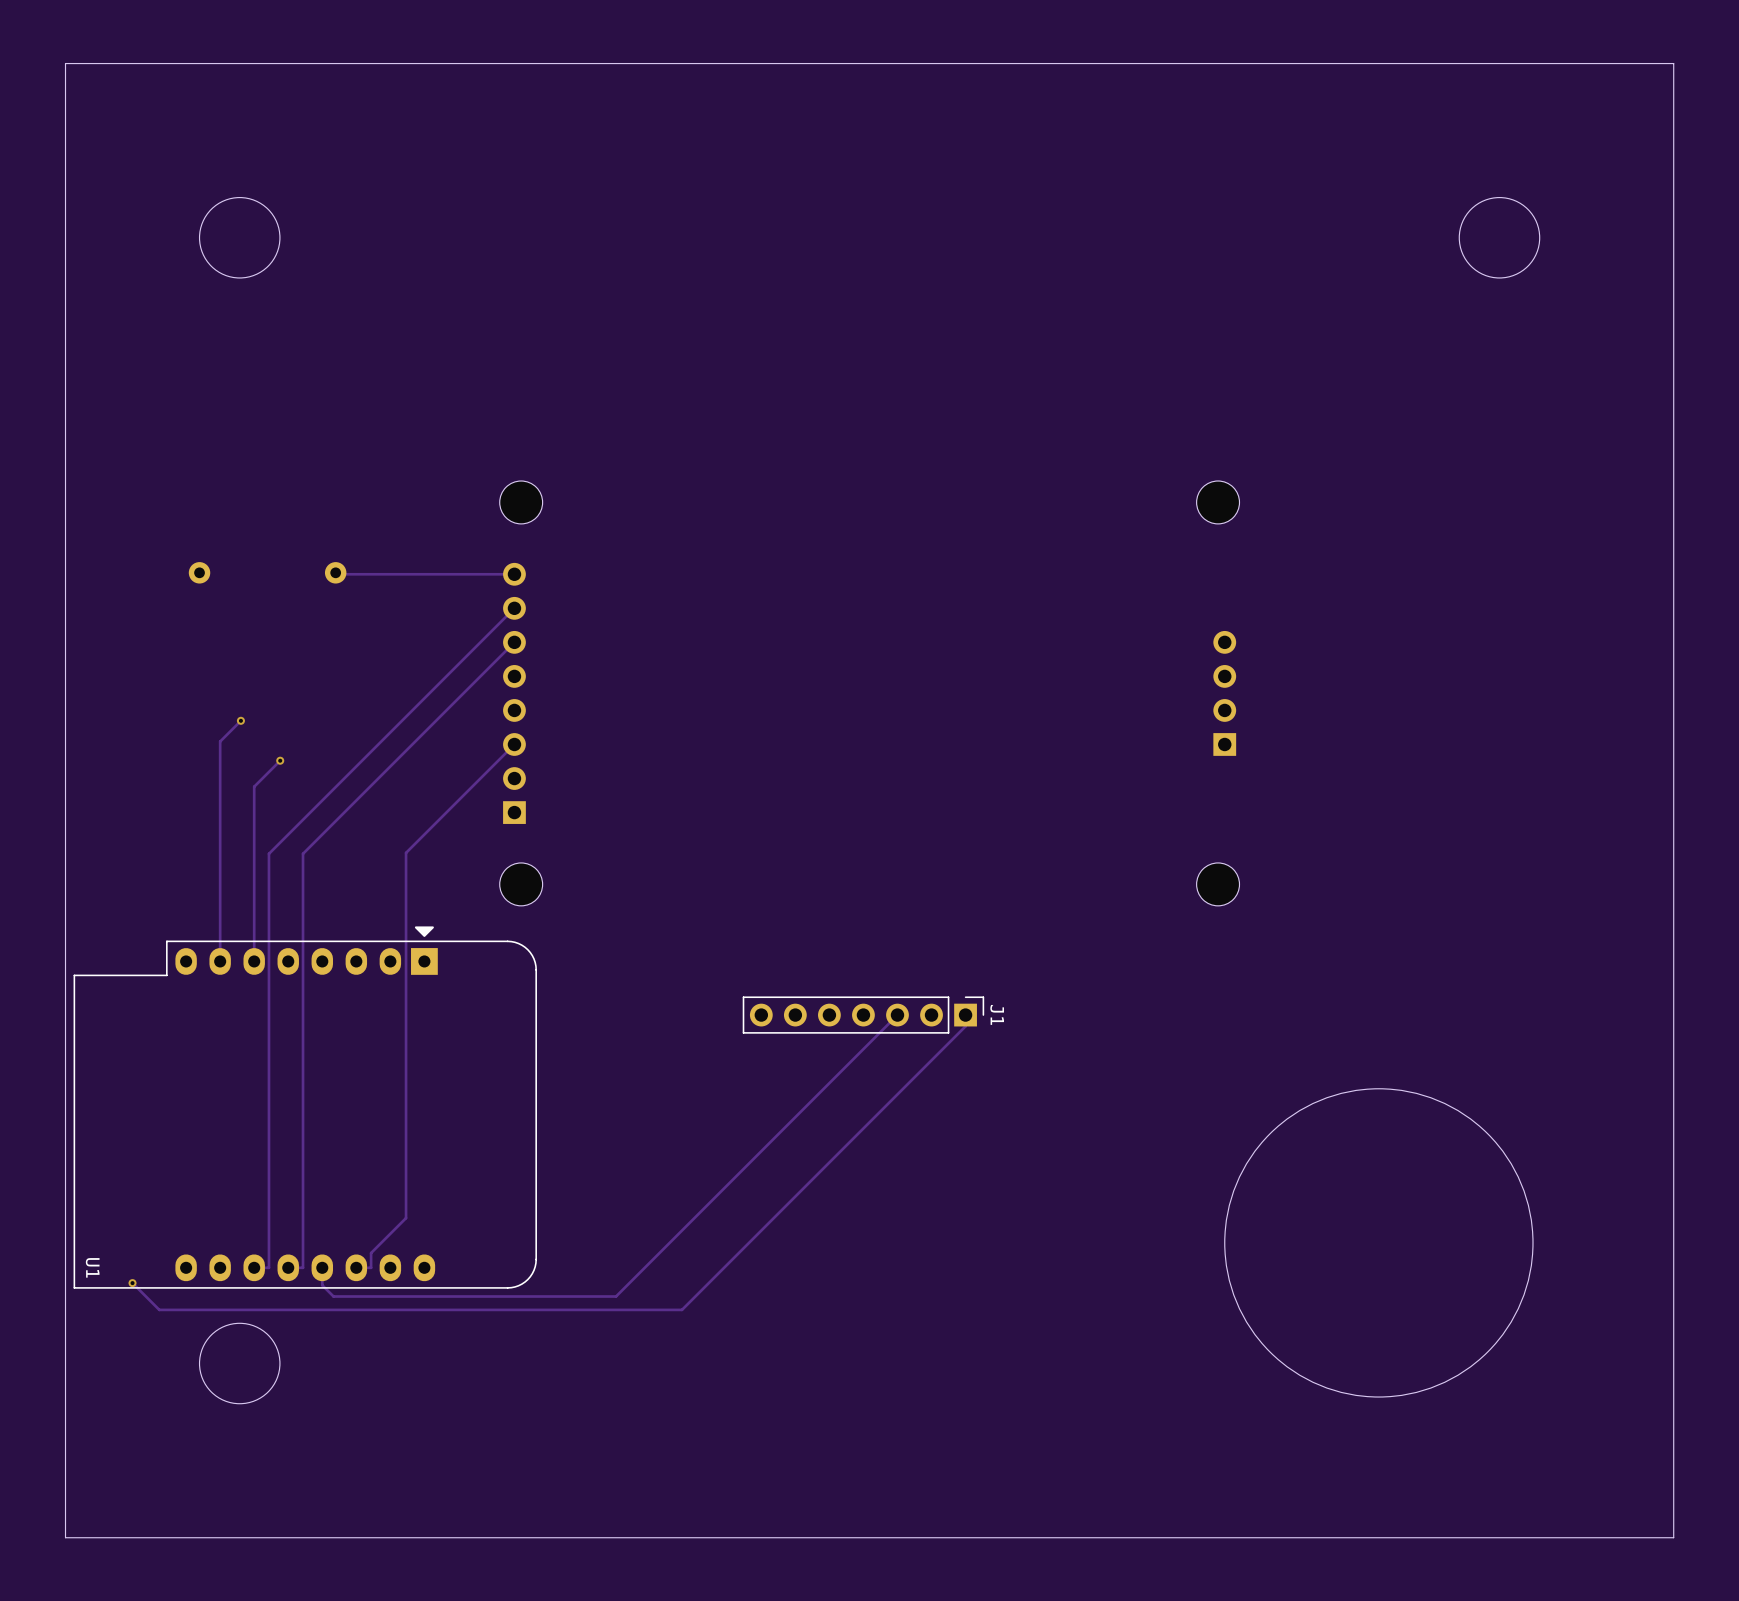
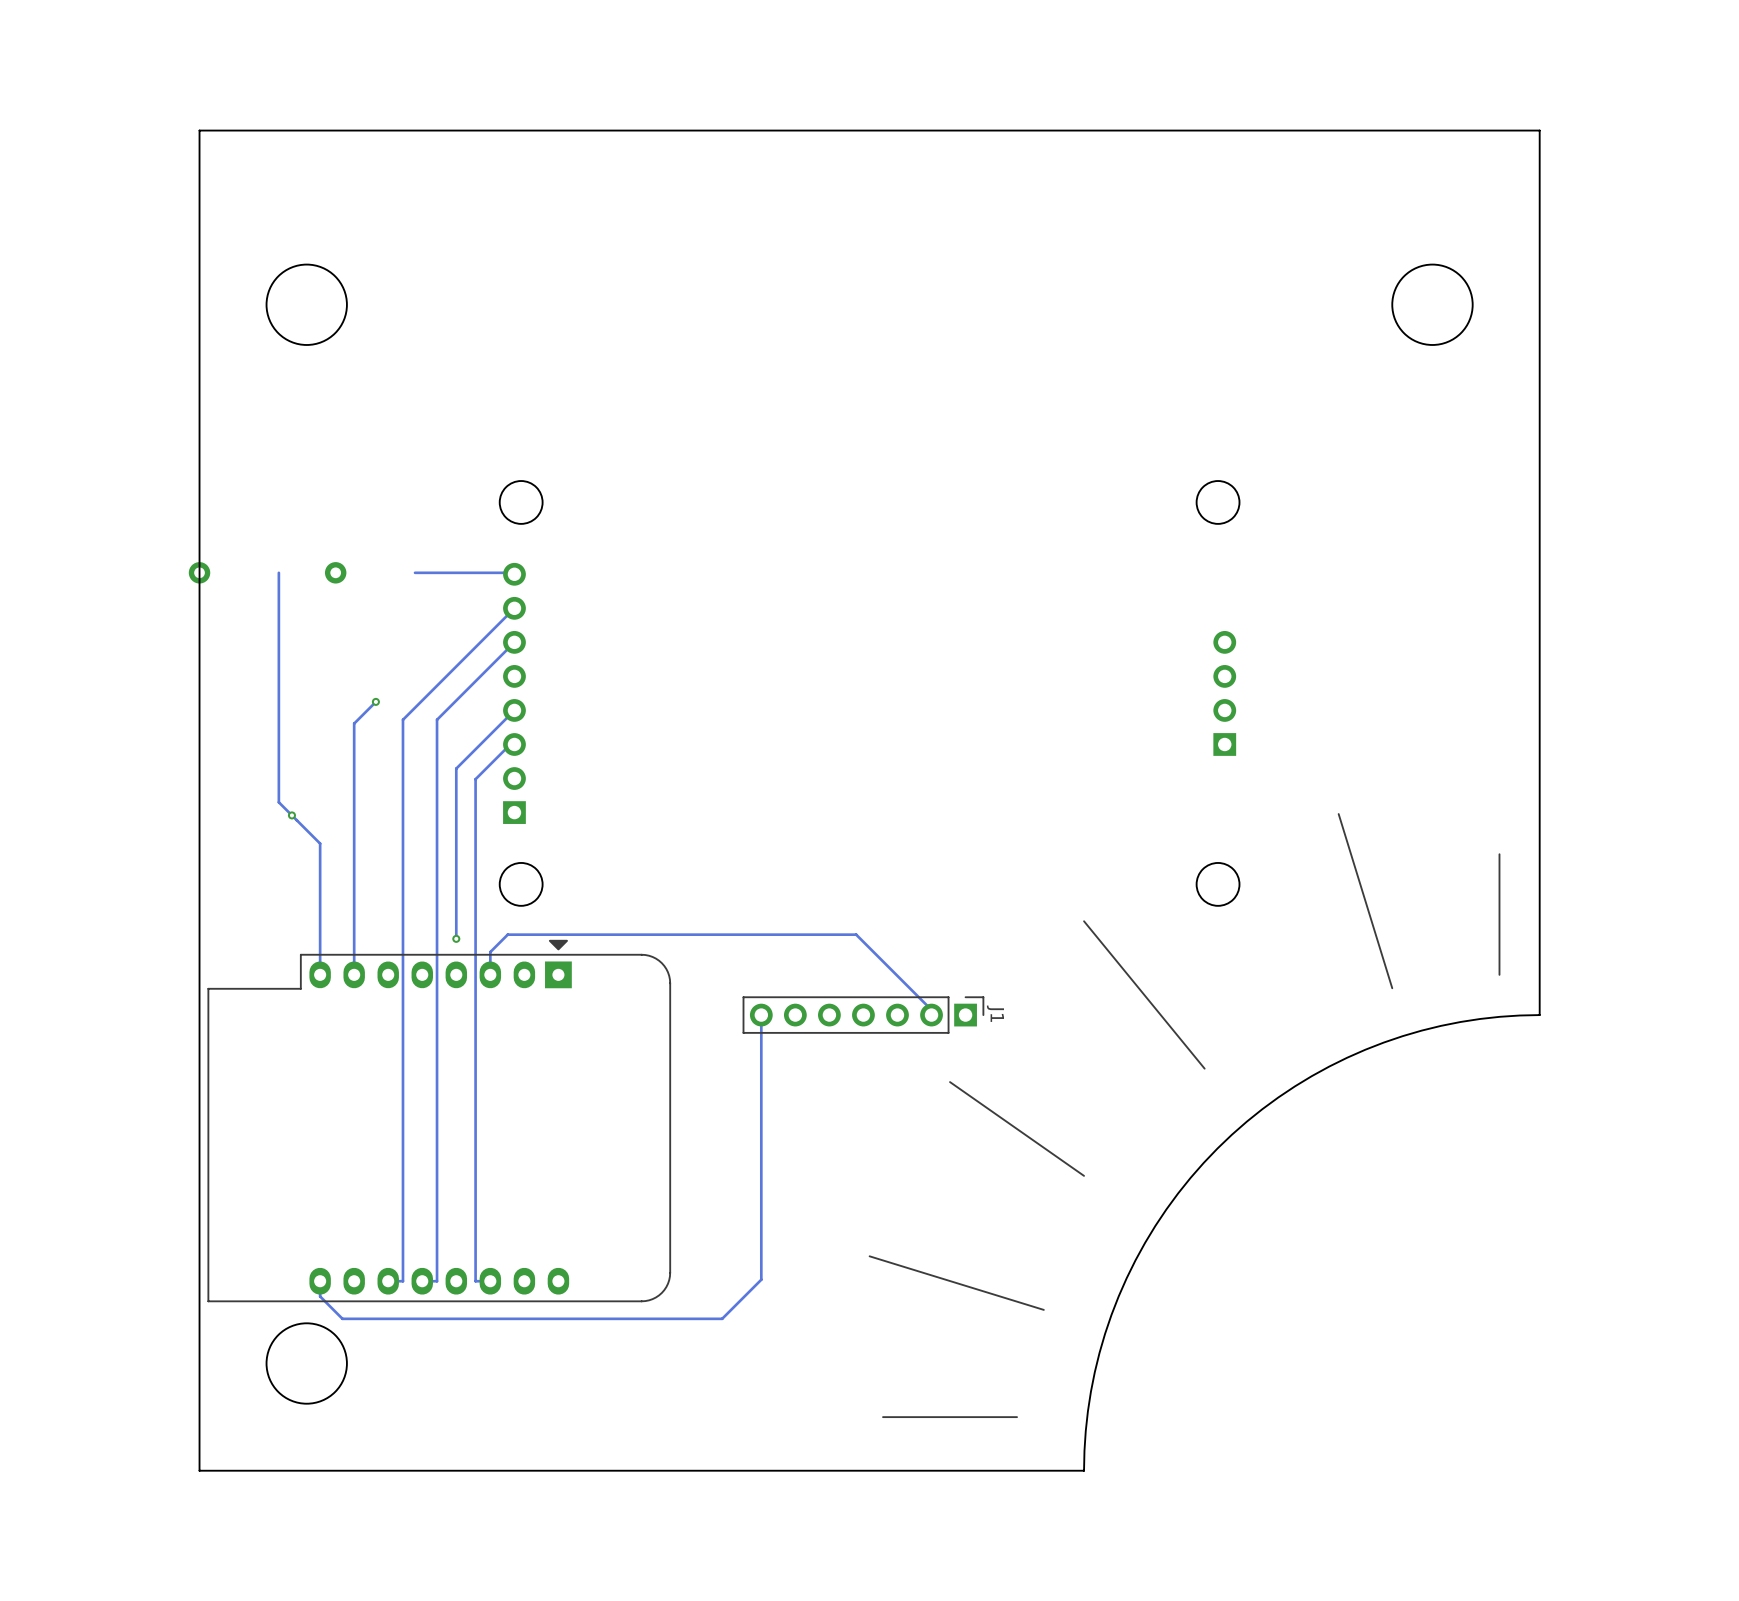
board edge: (1673, 63) (65, 63) (65, 1537) (1673, 1537) (1673, 63) -> (1539, 130) (1539, 1015) (1499, 1016) (1441, 1025) (1402, 1036) (1365, 1049) (1329, 1066) (1294, 1086) (1246, 1121) (1217, 1148) (1190, 1177) (1166, 1209) (1135, 1260) (1118, 1296) (1105, 1333) (1094, 1372) (1085, 1431) (1084, 1470) (199, 1470) (199, 130) (1539, 130)
round board edge position: (239, 237) -> (306, 304)
round board edge position: (1499, 237) -> (1432, 304)
track: none -> (278, 572) (278, 802) (320, 843) (320, 974)
track: (335, 572) (514, 574) -> (415, 572) (514, 574)
track: none -> (375, 701) (354, 723) (354, 974)
via: none -> (375, 701)
track: none -> (514, 710) (456, 768) (456, 938)
track: (402, 719) (268, 853) (268, 1267) (254, 1267) -> (402, 719) (402, 1281) (388, 1281)
track: (437, 719) (303, 853) (303, 1267) (288, 1267) -> (437, 719) (437, 1281) (422, 1281)
track: (240, 720) (220, 741) (220, 961) -> none
via: (240, 720) -> none
track: (514, 744) (406, 852) (406, 1218) (371, 1253) (371, 1267) (356, 1267) -> (514, 744) (510, 744) (475, 779) (475, 1281) (490, 1281)
track: (280, 760) (254, 786) (254, 961) -> none
via: (280, 760) -> none
line: none -> (1338, 814) (1392, 988)
via: none -> (291, 815)
line: none -> (1499, 854) (1499, 974)
line: none -> (1084, 921) (1204, 1068)
via: none -> (456, 938)
track: none -> (490, 974) (490, 952) (507, 934) (856, 934) (931, 1009) (931, 1015)
track: none -> (761, 1015) (761, 1279) (722, 1318) (342, 1318) (320, 1296) (320, 1281)
track: (897, 1015) (616, 1296) (333, 1296) (322, 1285) (322, 1267) -> none
track: (965, 1015) (965, 1026) (681, 1309) (159, 1309) (132, 1283) -> none
line: none -> (950, 1082) (1084, 1175)
round board edge: [1224, 1088, 1534, 1398] -> none
U1: (305, 1107) -> none
part: none -> (439, 1120)
line: none -> (869, 1256) (1043, 1309)
via: (132, 1283) -> none
round board edge position: (239, 1363) -> (306, 1363)
line: none -> (1017, 1417) (883, 1417)

